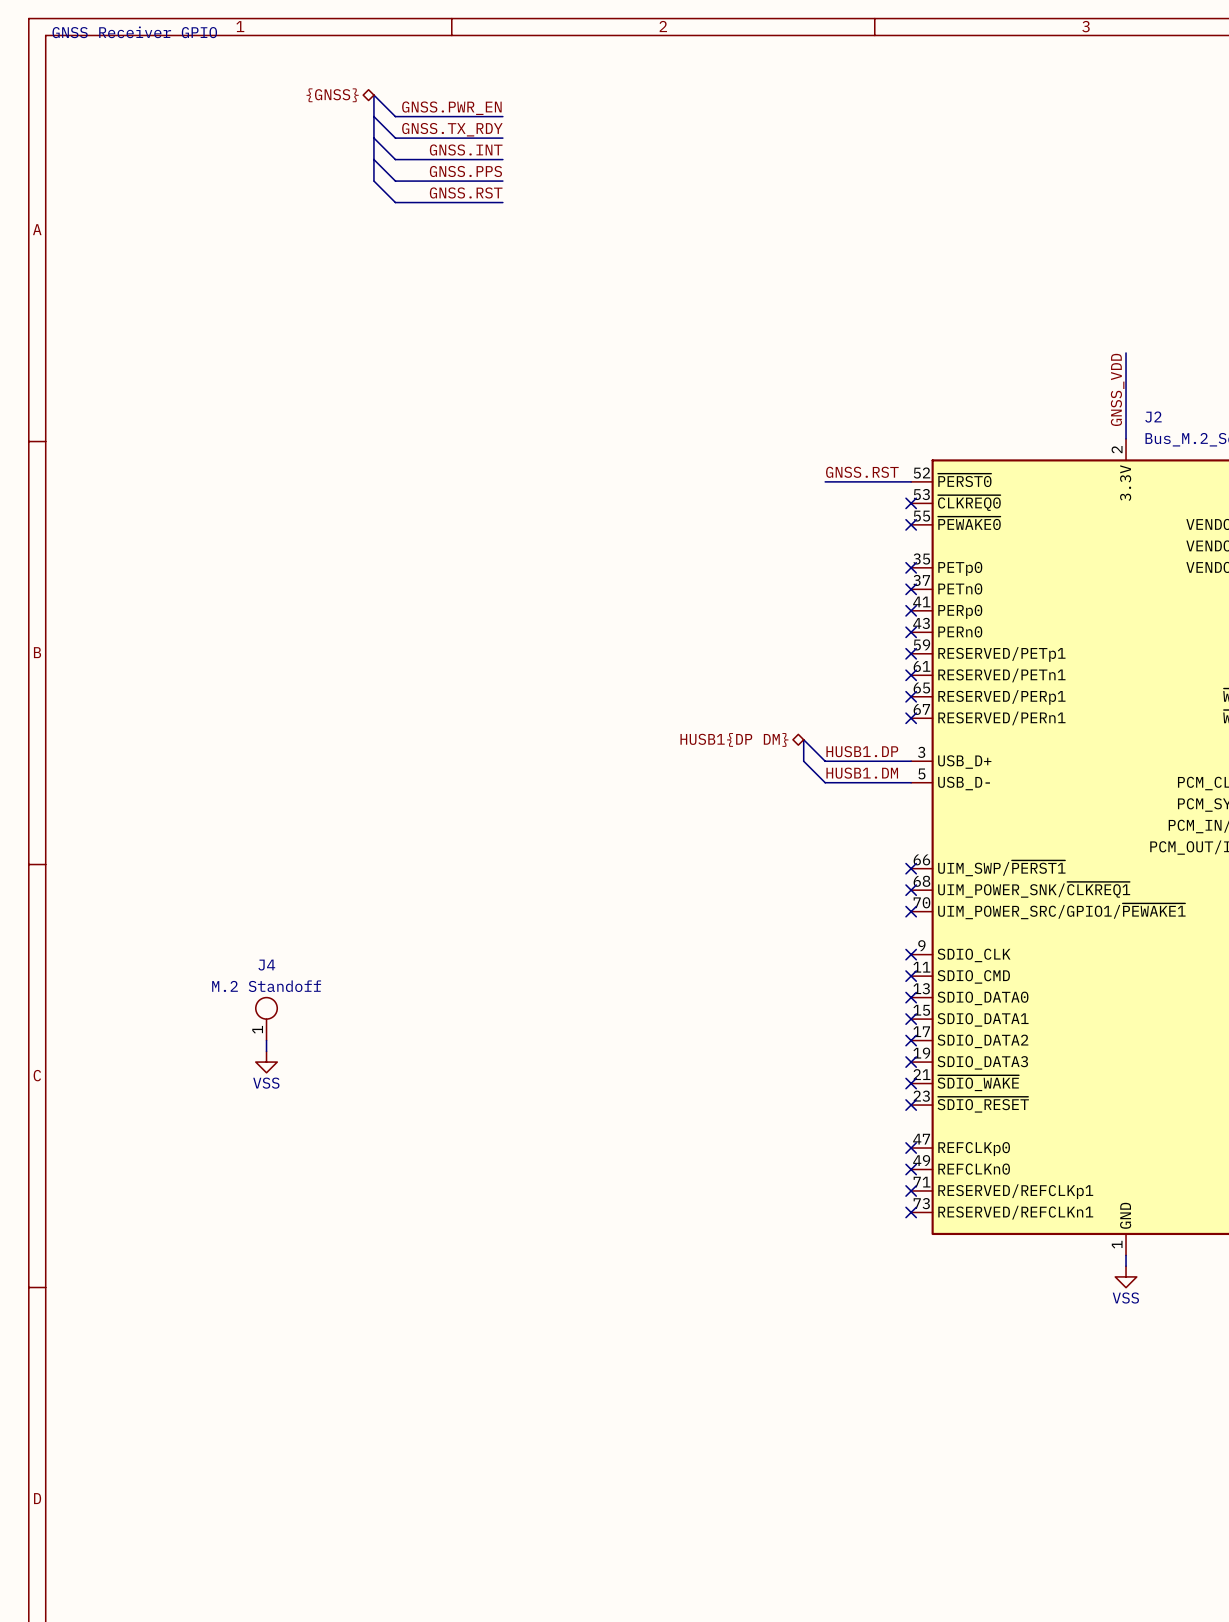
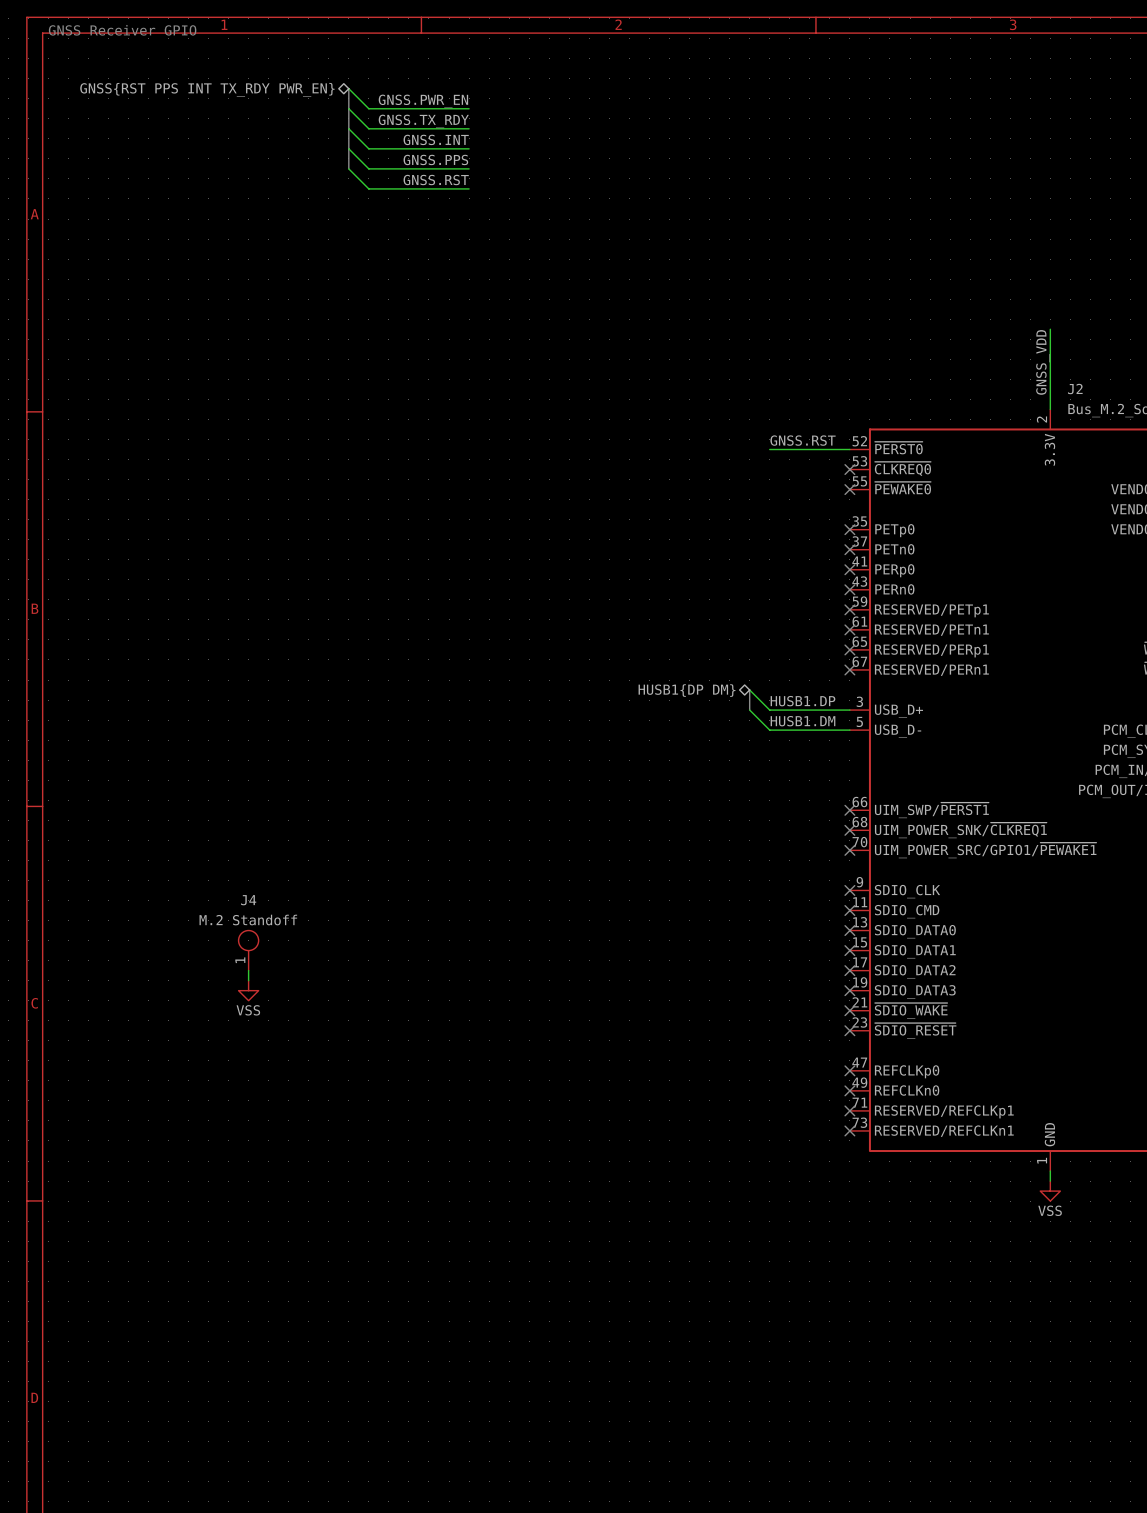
hierarchical label: {GNSS} (332, 95) -> GNSS{RST PPS INT TX_RDY PWR_EN} (207, 89)

